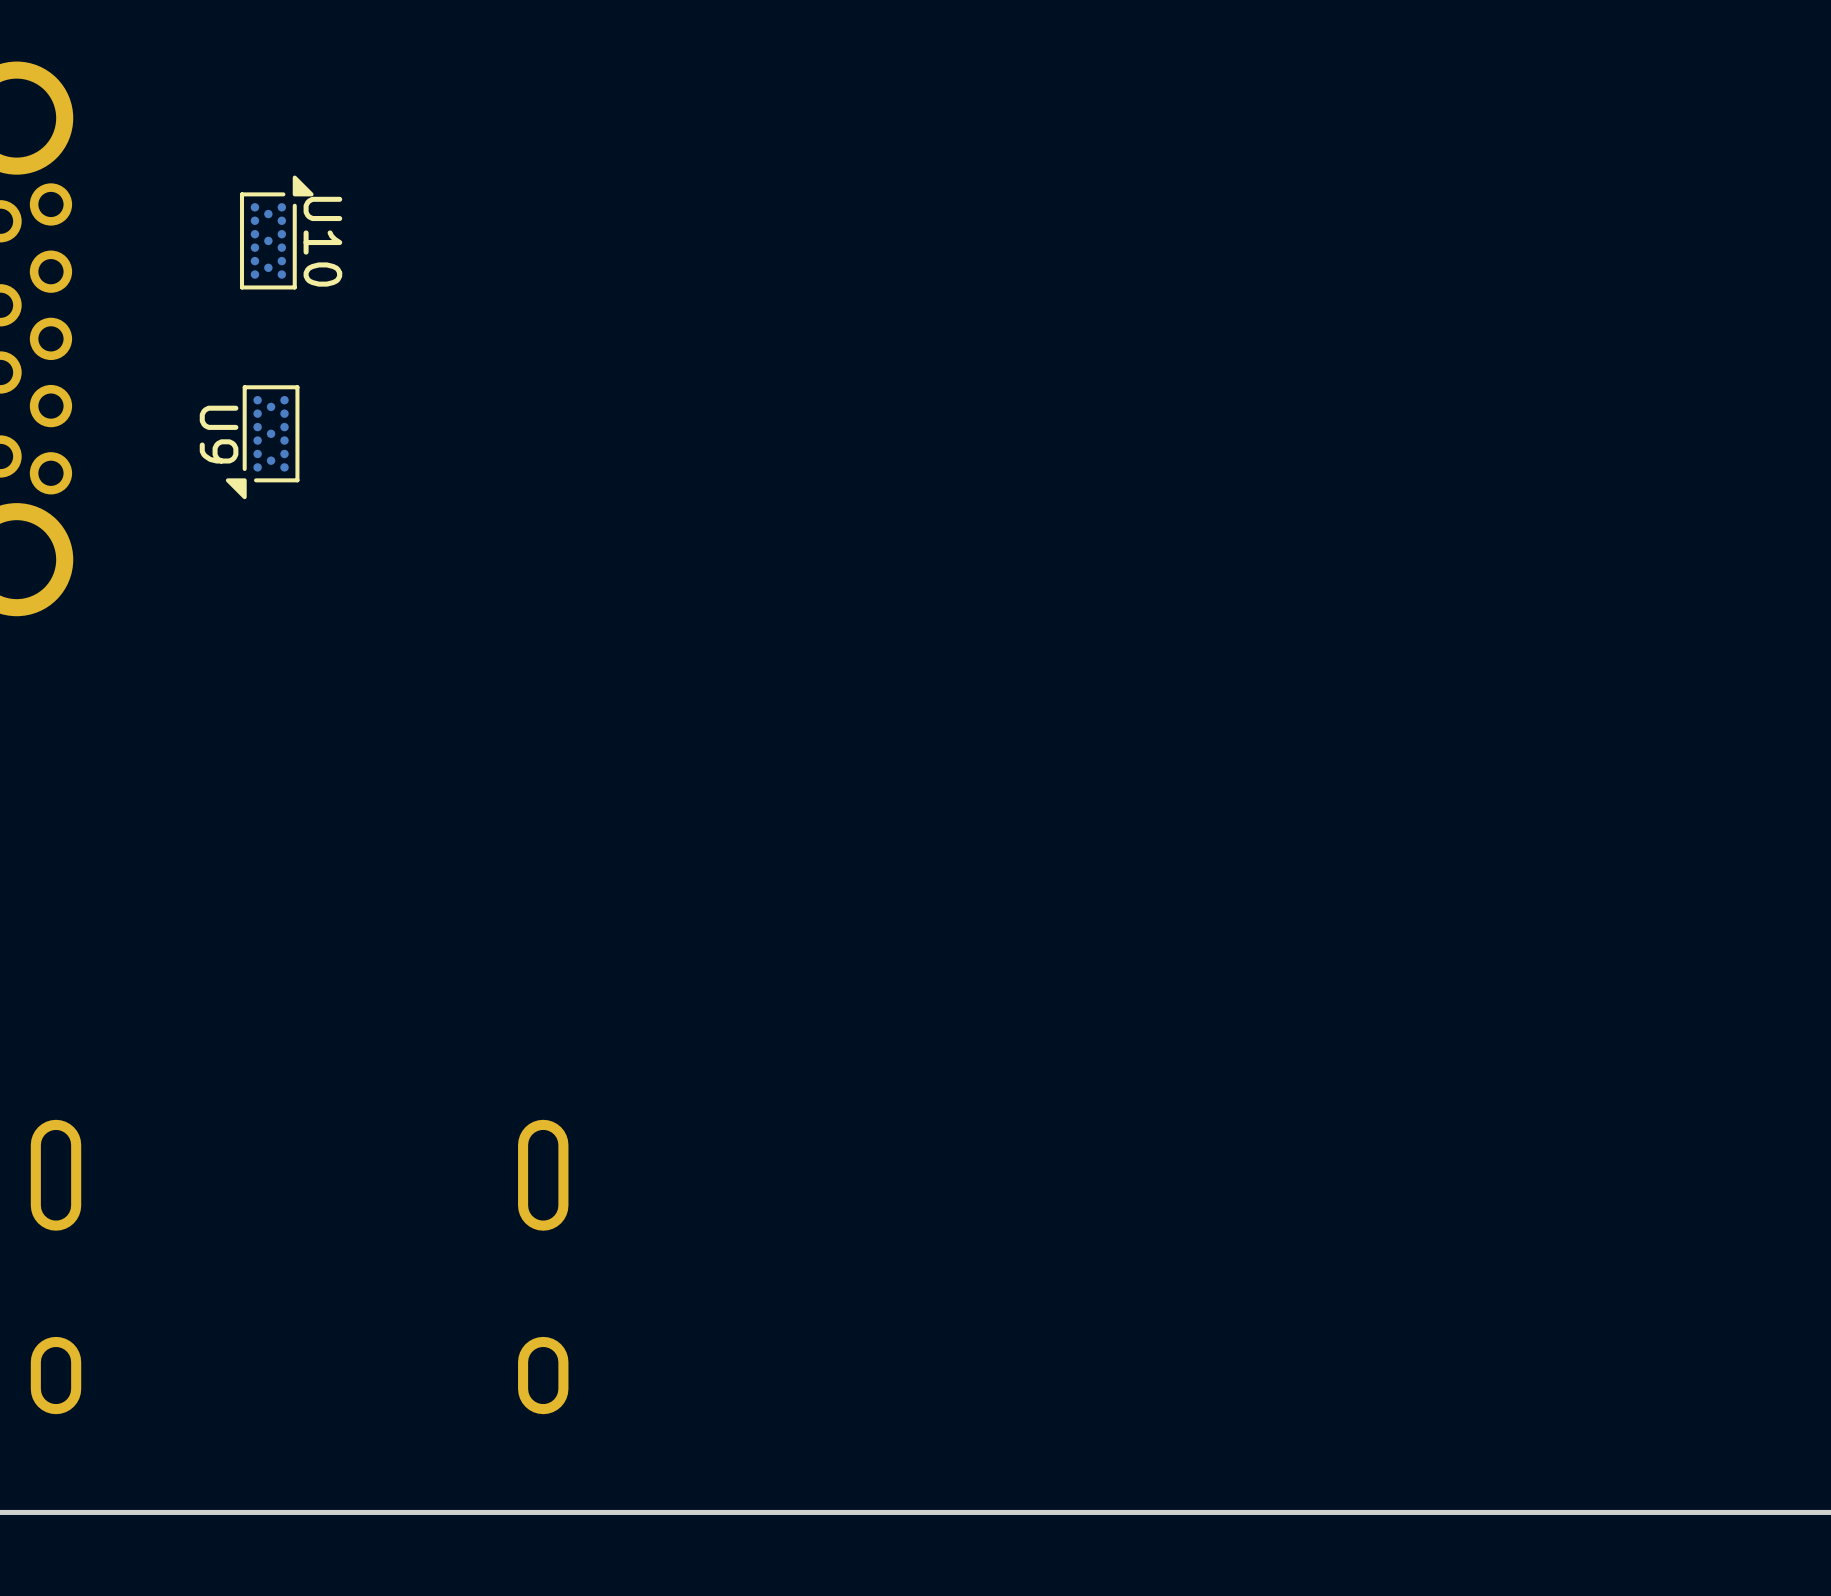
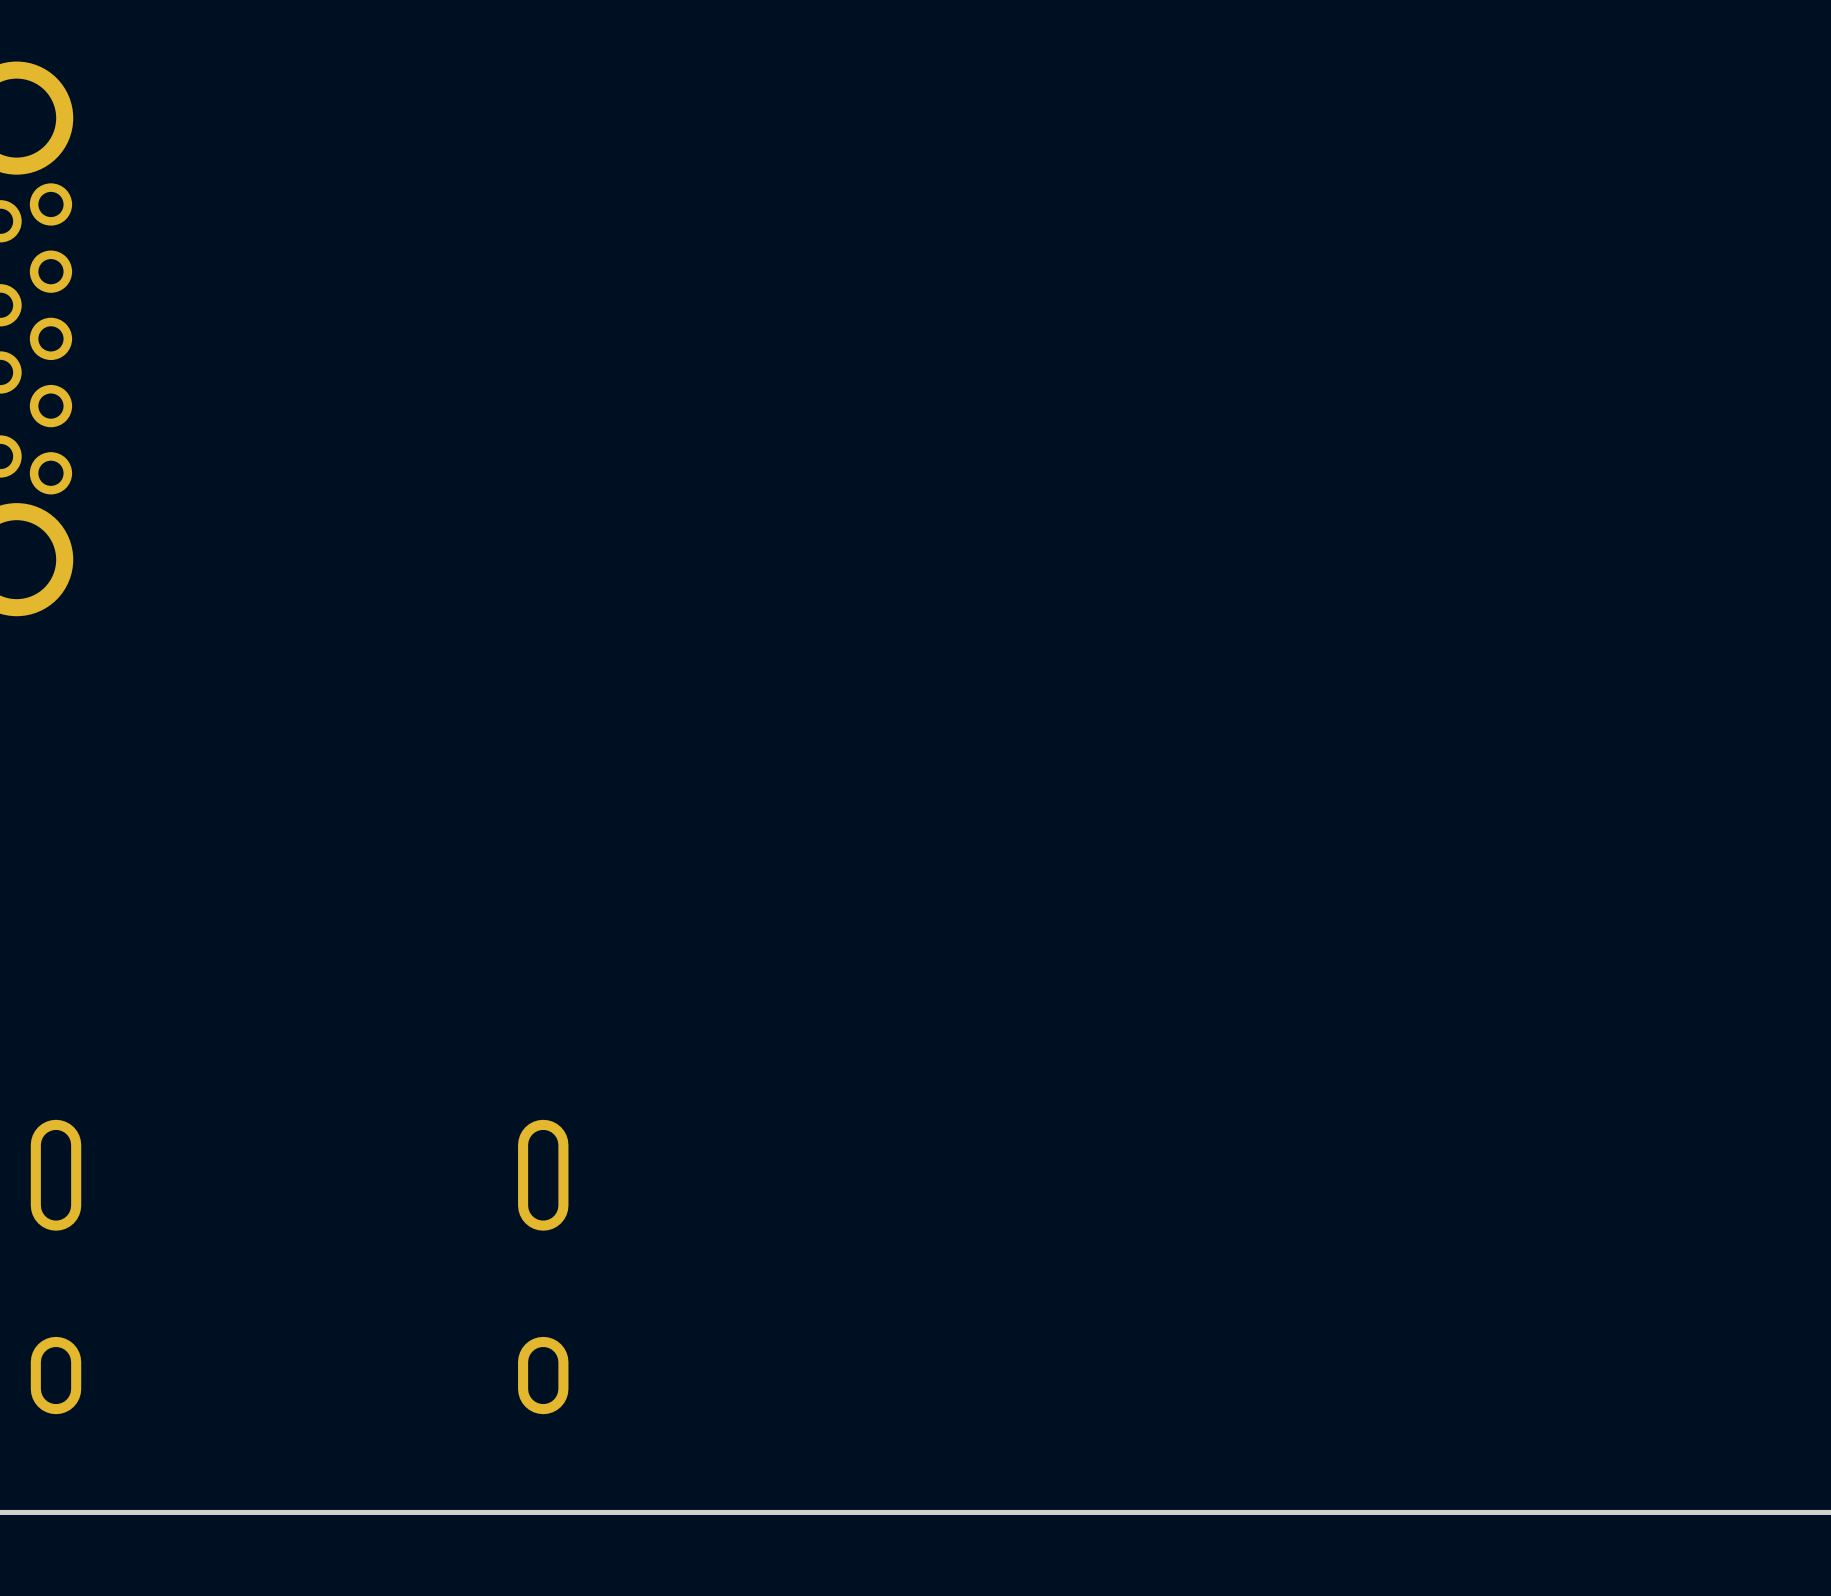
U10: (276, 232) -> none
U9: (262, 442) -> none

